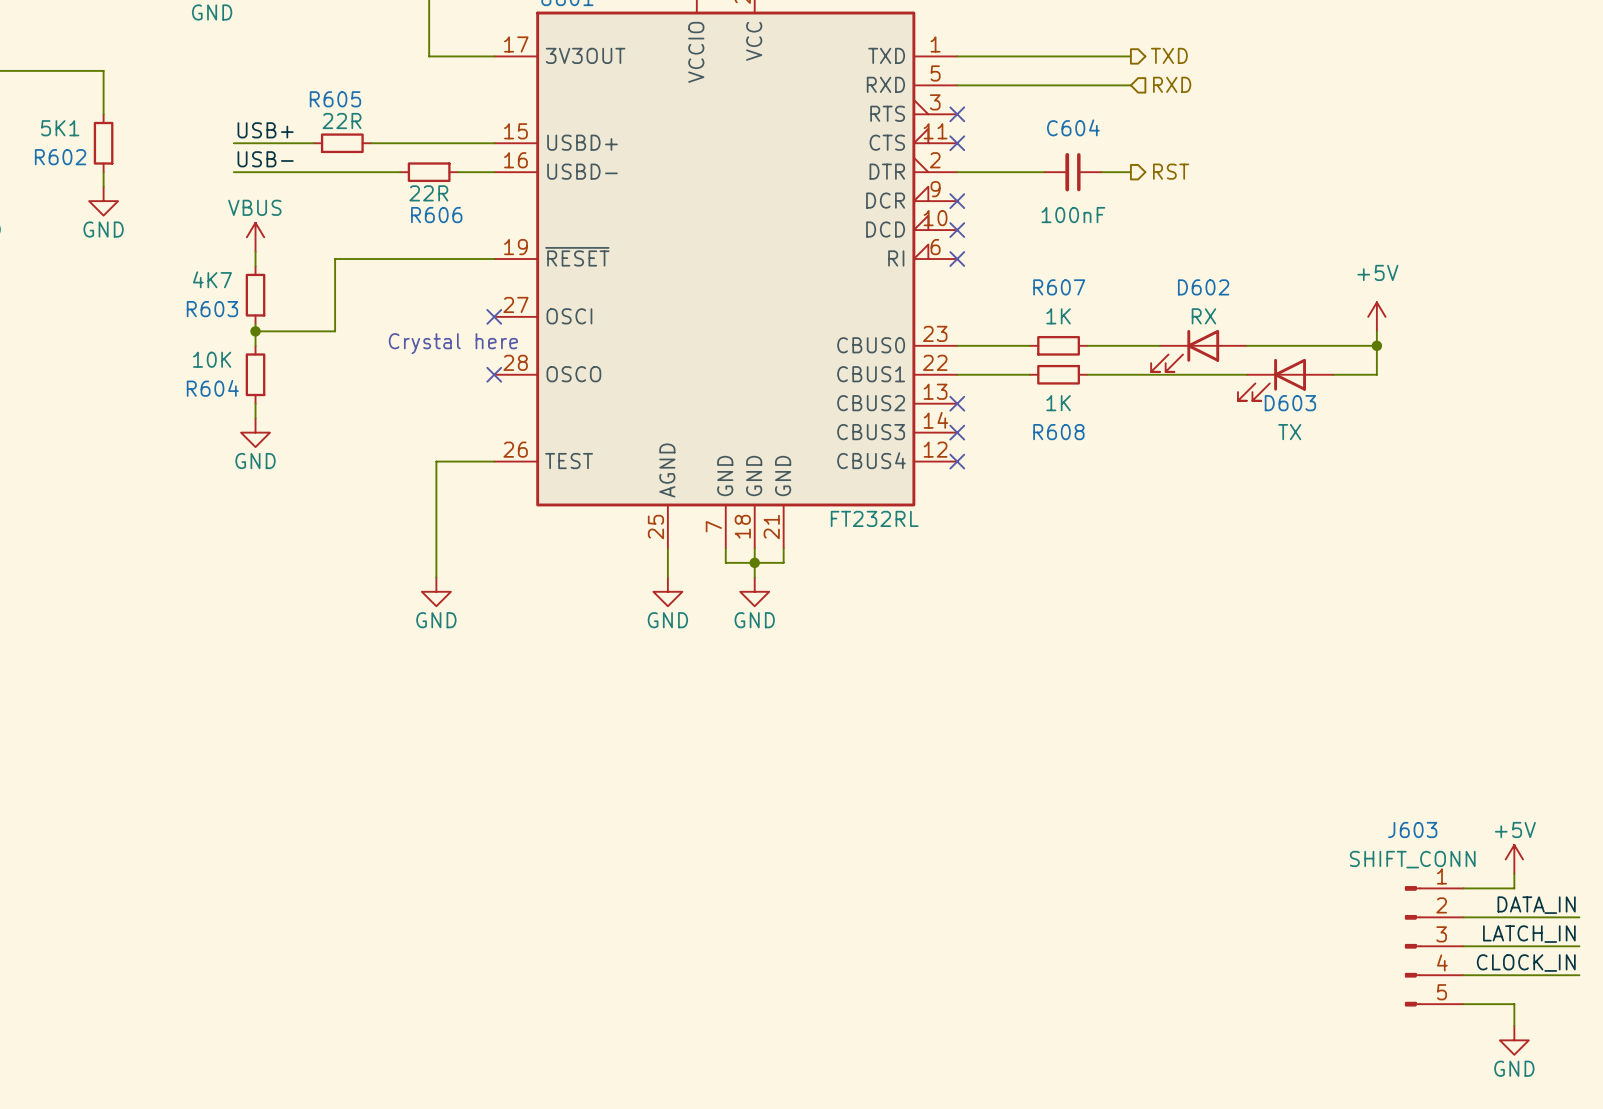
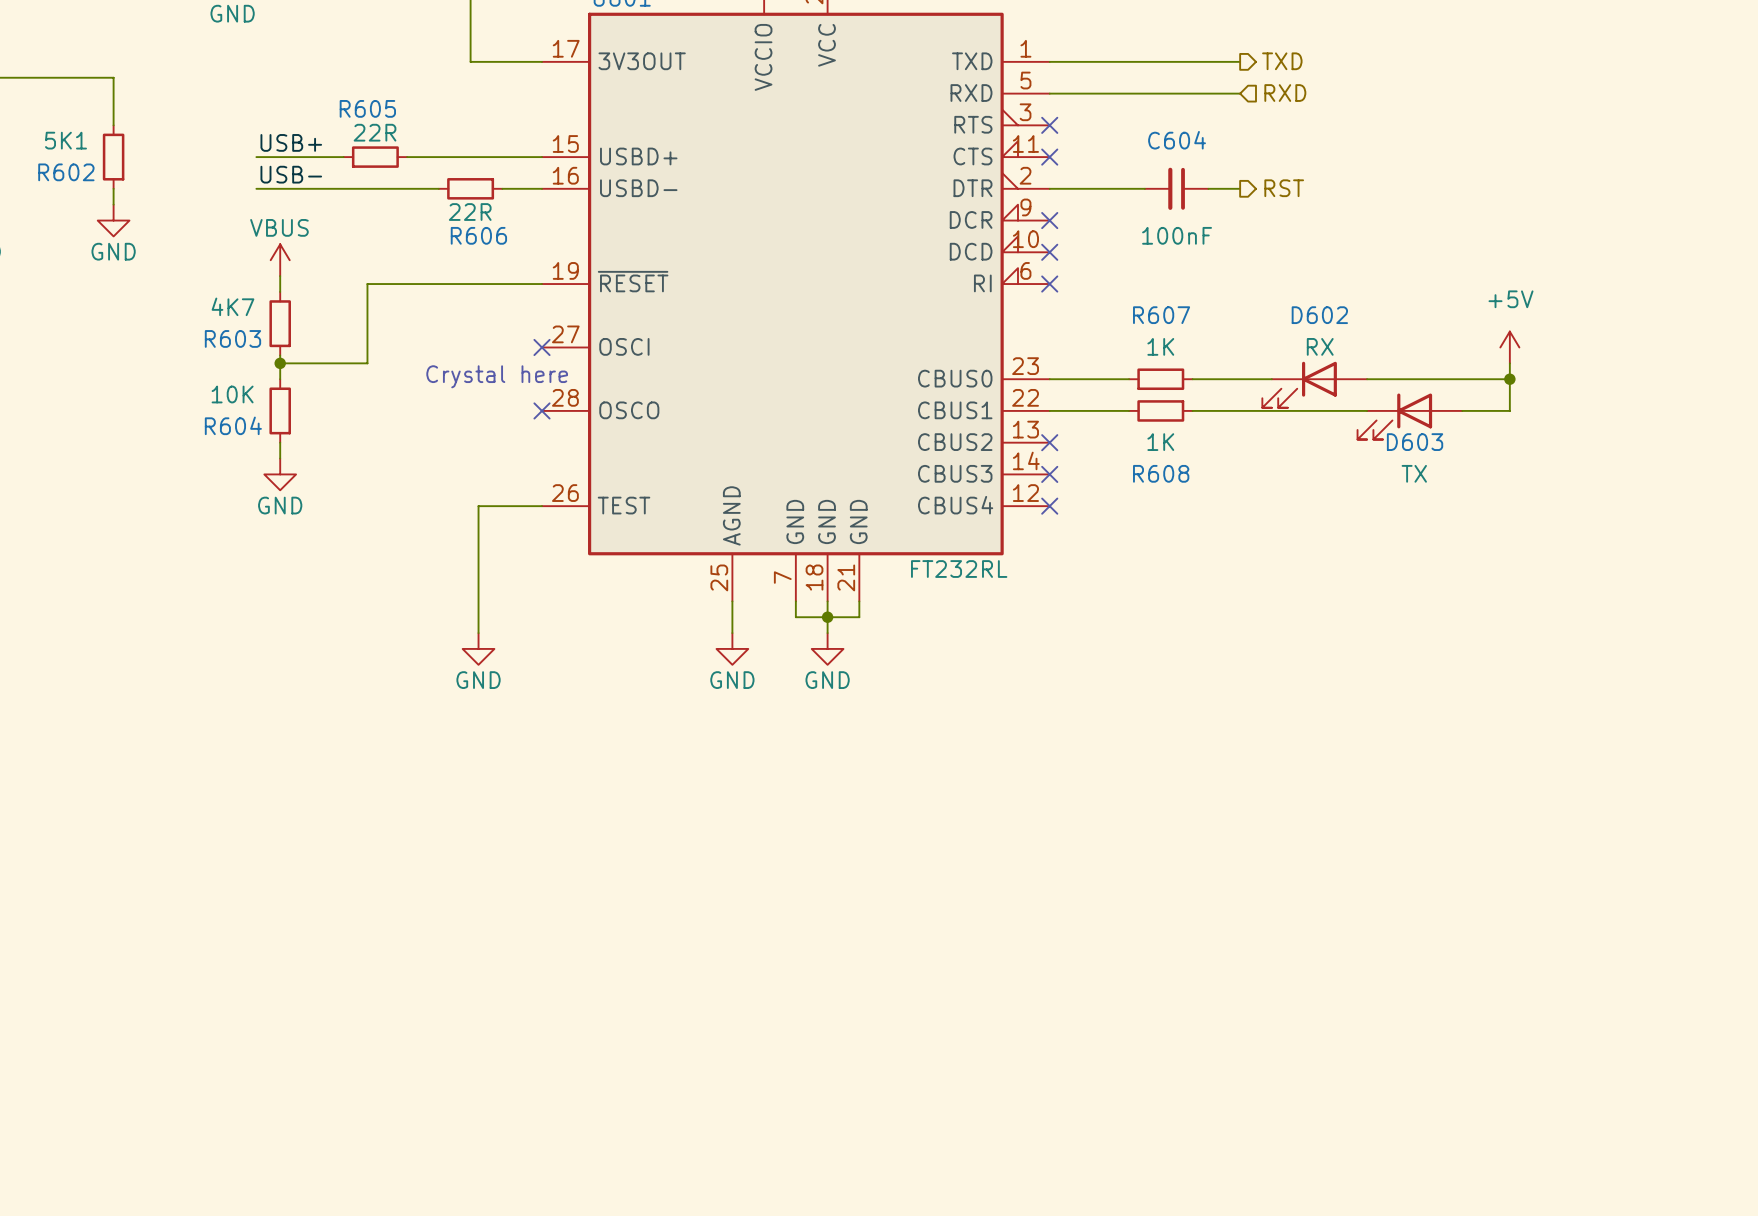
power symbol: +5V (1514, 859) -> none
wire: (1514, 873) (1514, 888) (1463, 888) -> none
label: DATA_IN (1536, 905) -> none
wire: (1463, 917) (1579, 917) -> none
label: LATCH_IN (1529, 934) -> none
J603: SHIFT_CONN (1434, 946) -> none
wire: (1463, 946) (1579, 946) -> none
label: CLOCK_IN (1526, 963) -> none
wire: (1463, 975) (1579, 975) -> none
wire: (1463, 1004) (1514, 1004) (1514, 1025) -> none
power symbol: GND (1514, 1040) -> none

